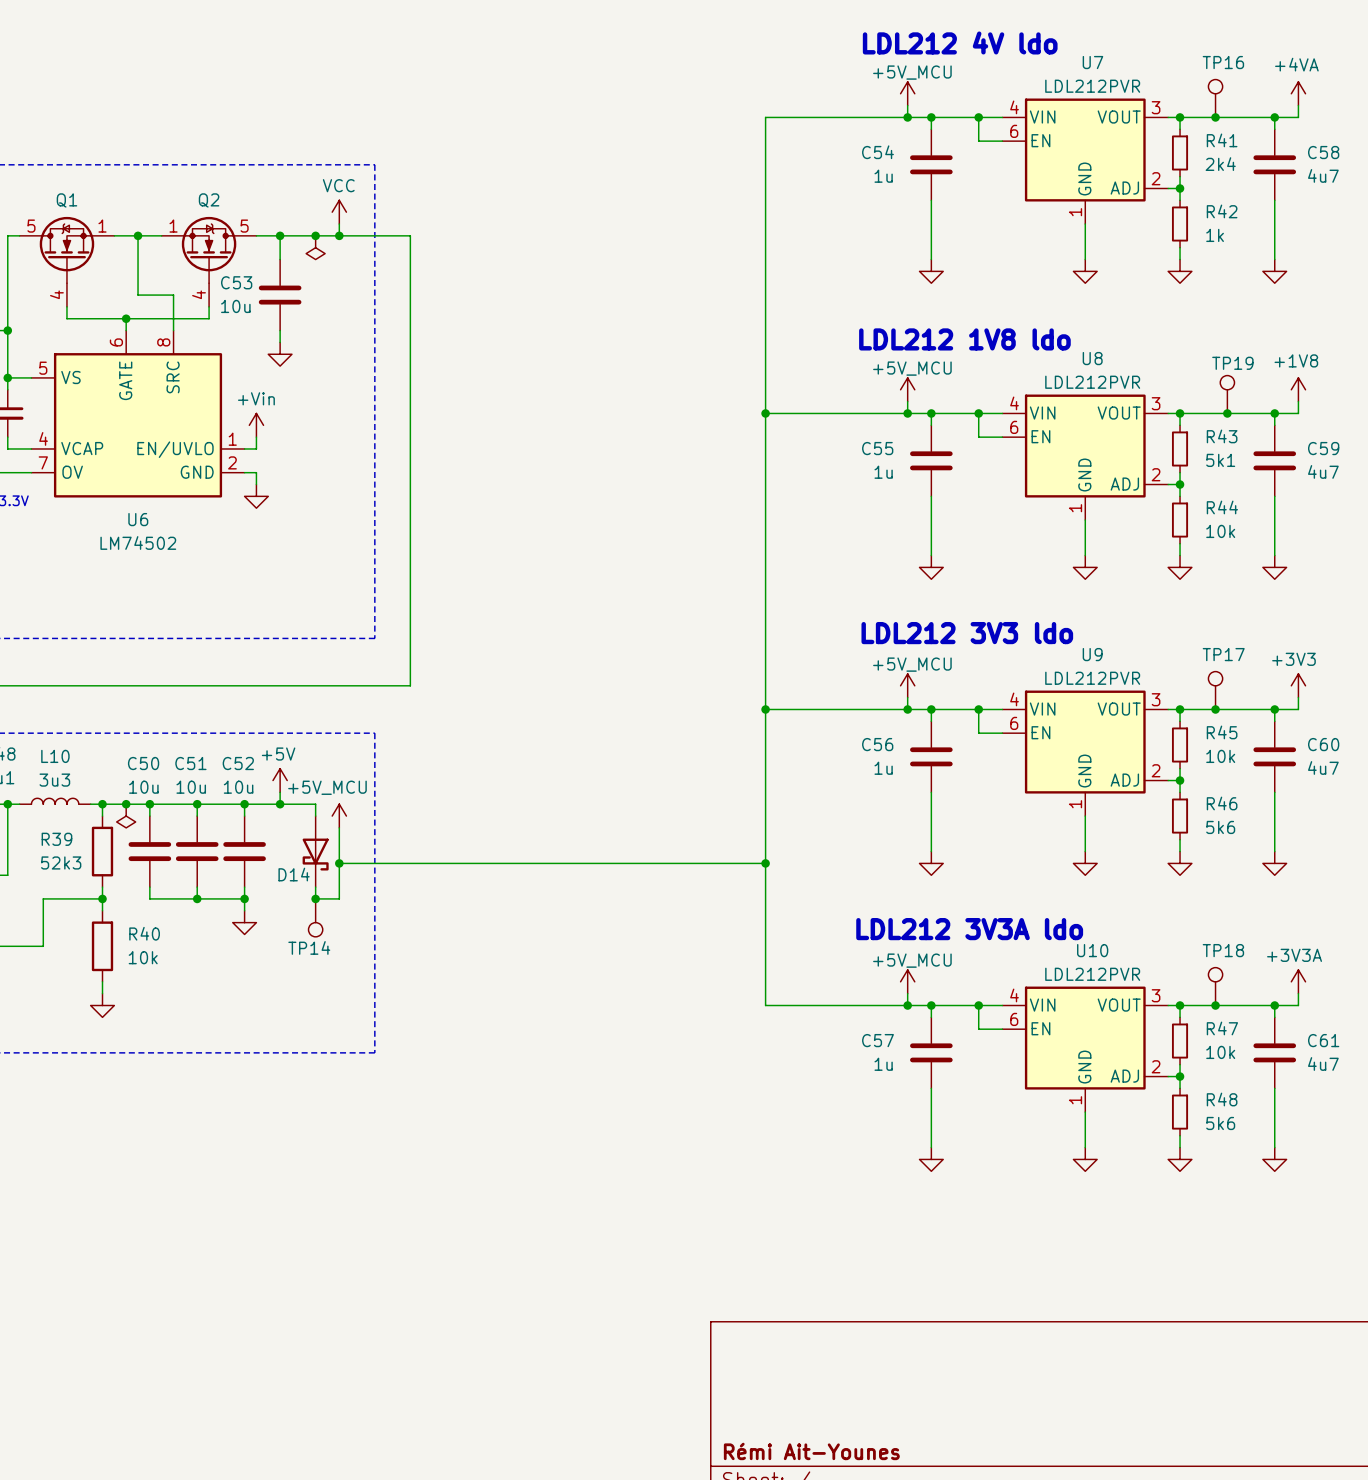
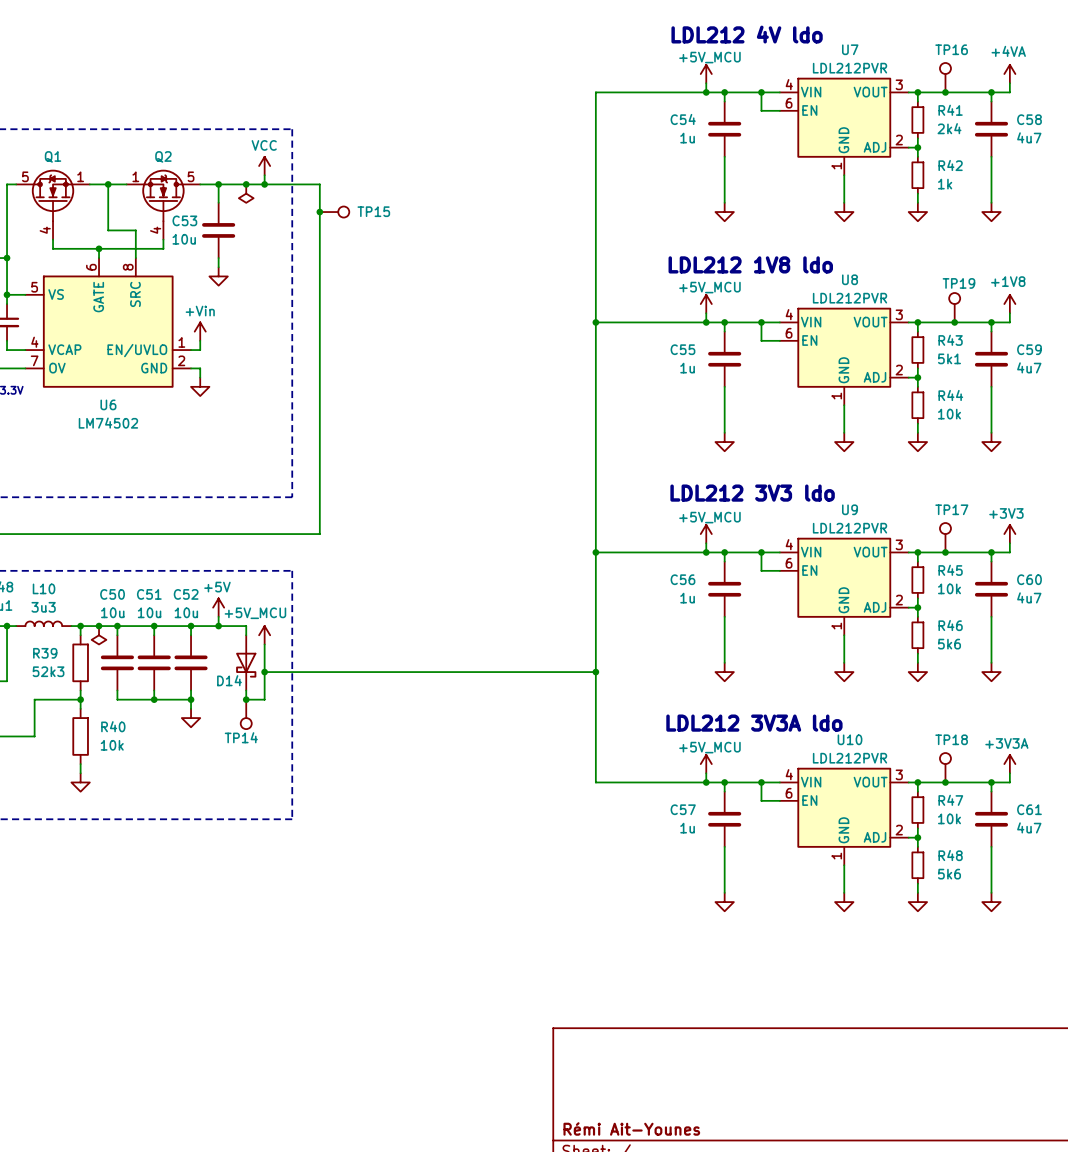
junction: none -> (319, 212)
TP15: none -> (334, 212)

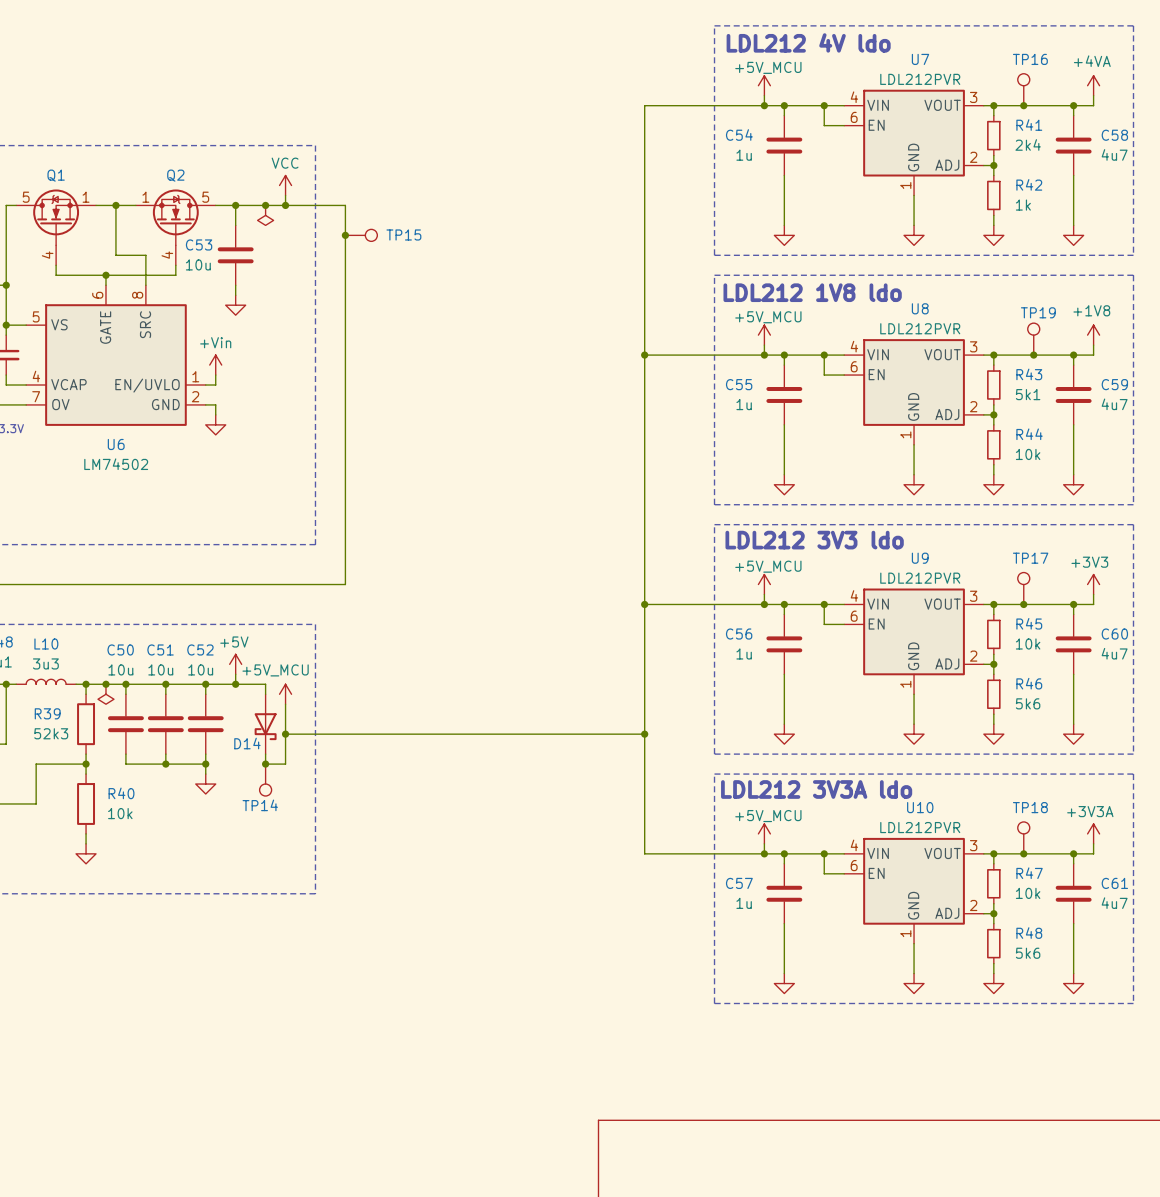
line: none -> (714, 25) (1133, 25) (1133, 255) (714, 255) (714, 25)
line: none -> (714, 275) (714, 504) (1133, 504) (1133, 275) (714, 275)
line: none -> (714, 524) (714, 754) (1133, 754) (1133, 524) (714, 524)
line: none -> (714, 774) (714, 1003) (1133, 1003) (1133, 774) (714, 774)

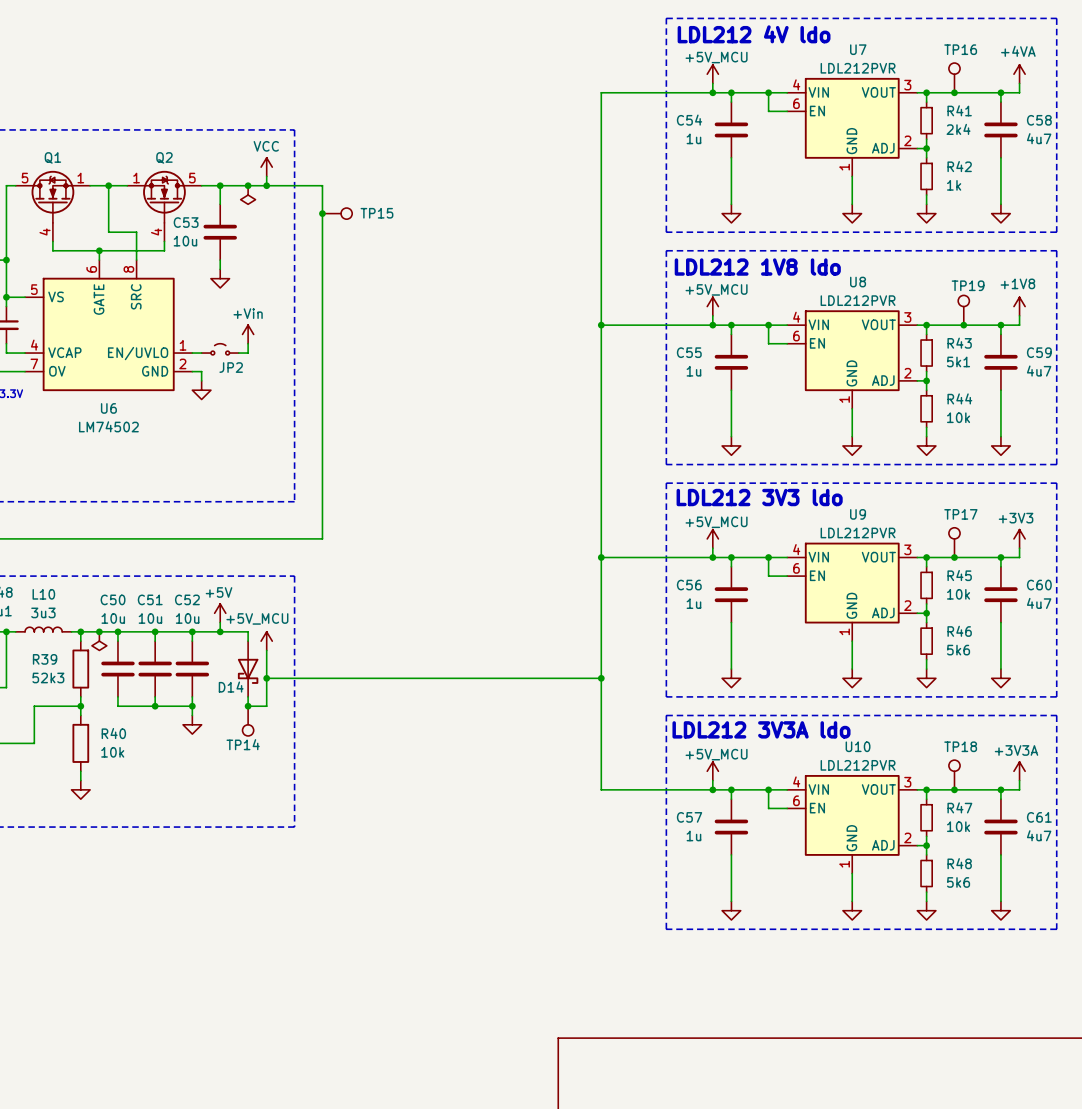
power symbol position: +Vin (215, 365) -> +Vin (248, 334)
wire: (215, 375) (215, 385) -> none
wire: none -> (248, 343) (248, 353) (238, 353)
JP2: none -> (220, 349)

